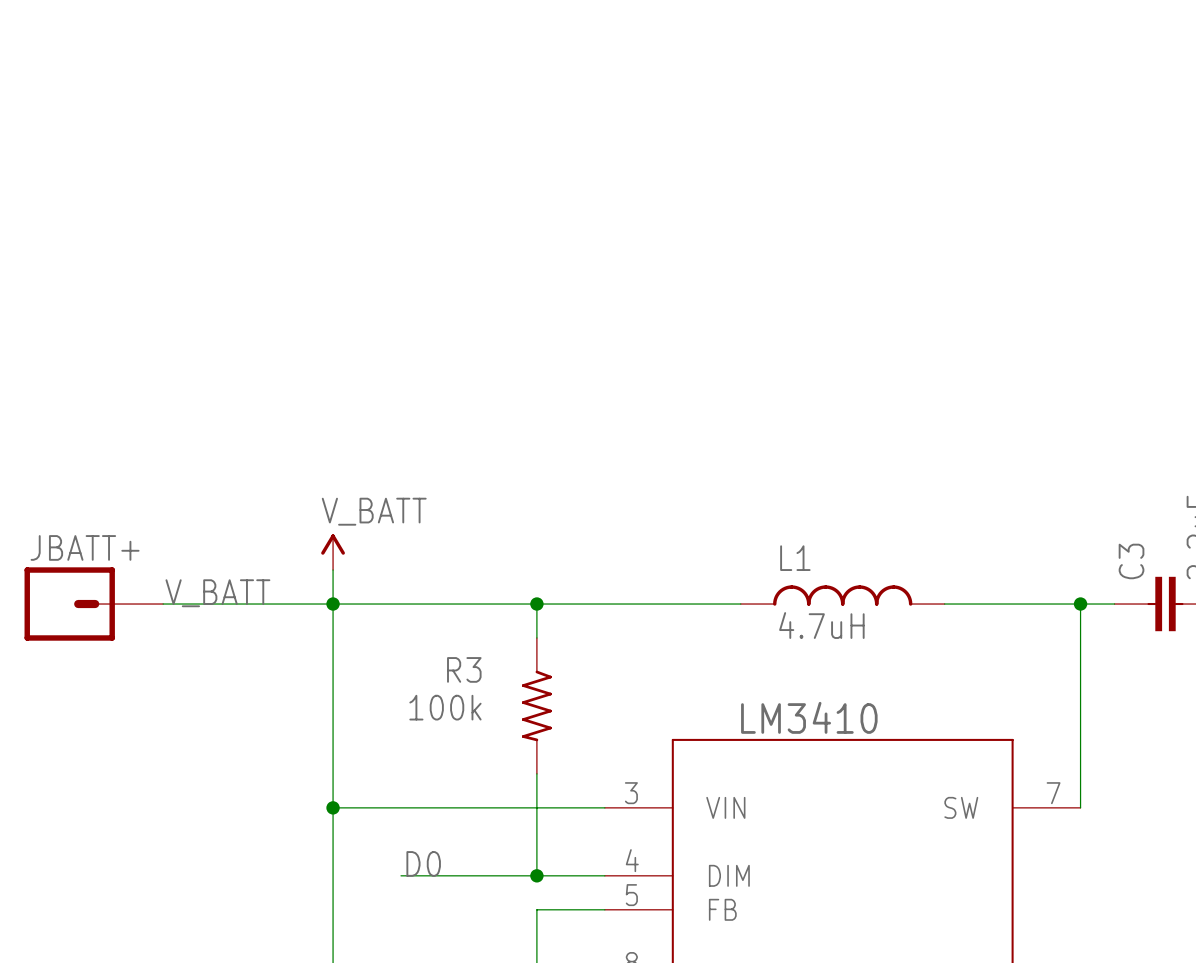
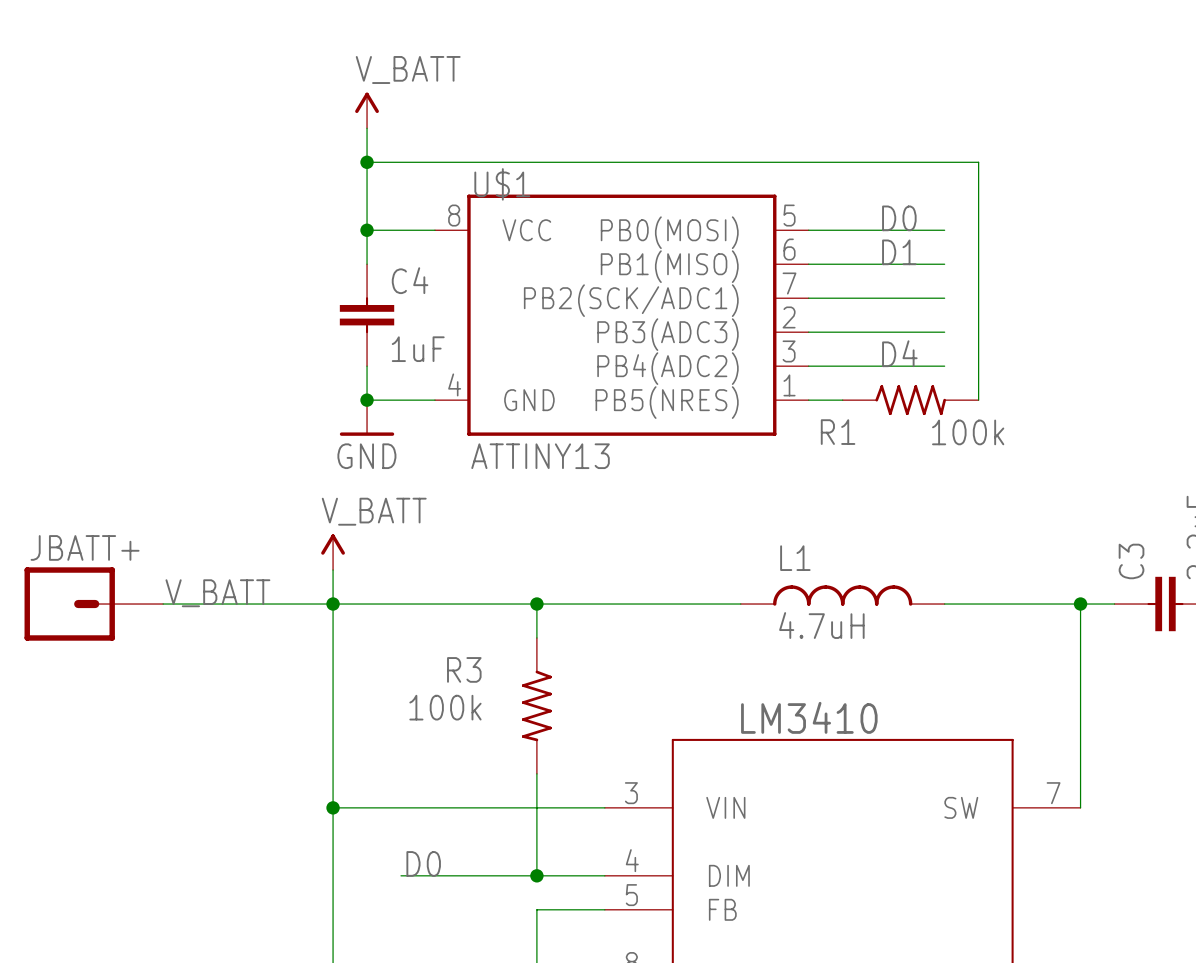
power symbol: none -> V_BATT (367, 110)
wire: none -> (367, 128) (367, 264)
wire: none -> (367, 162) (978, 162) (978, 400)
junction: none -> (367, 162)
label: none -> D0 (899, 218)
wire: none -> (367, 230) (434, 230)
junction: none -> (367, 230)
wire: none -> (808, 230) (944, 230)
label: none -> D1 (899, 252)
wire: none -> (808, 264) (944, 264)
wire: none -> (808, 298) (944, 298)
C4: none -> 1uF (367, 315)
U$1: none -> ATTINY13 (621, 315)
wire: none -> (808, 332) (944, 332)
label: none -> D4 (899, 353)
wire: none -> (367, 366) (367, 400) (434, 400)
wire: none -> (808, 366) (944, 366)
junction: none -> (367, 400)
wire: none -> (808, 400) (842, 400)
R1: none -> 100k (910, 400)
power symbol: none -> GND (367, 417)

